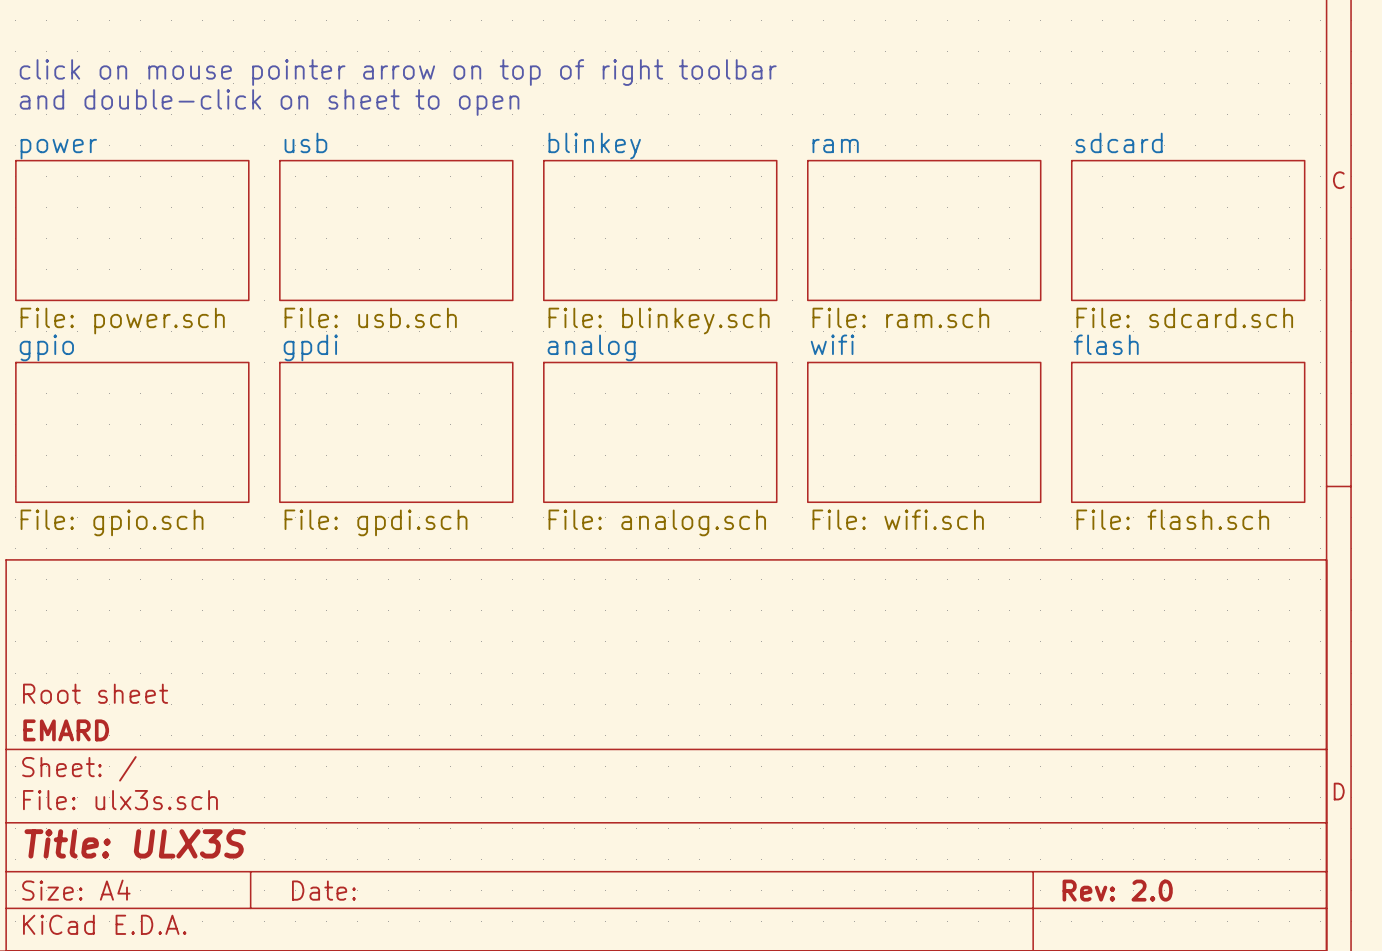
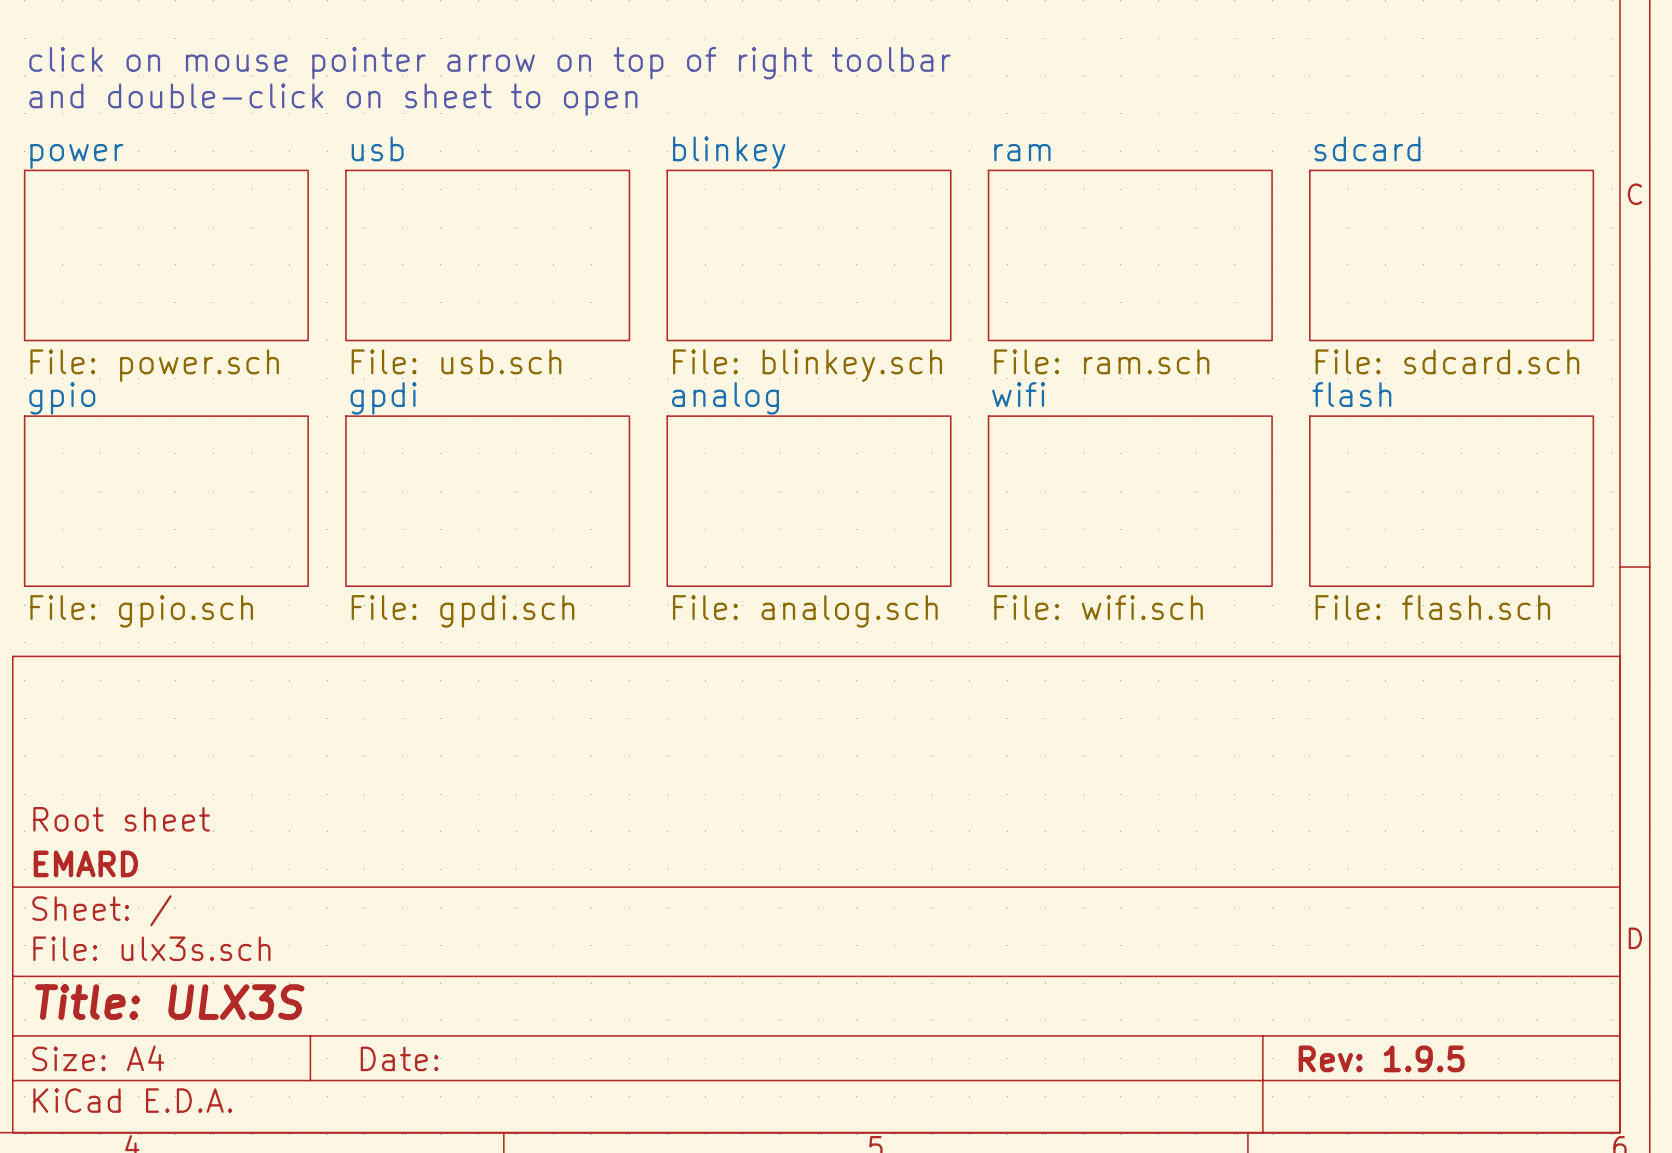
title block: Rev: 2.0 (1117, 890) -> Rev: 1.9.5 (1381, 1058)

